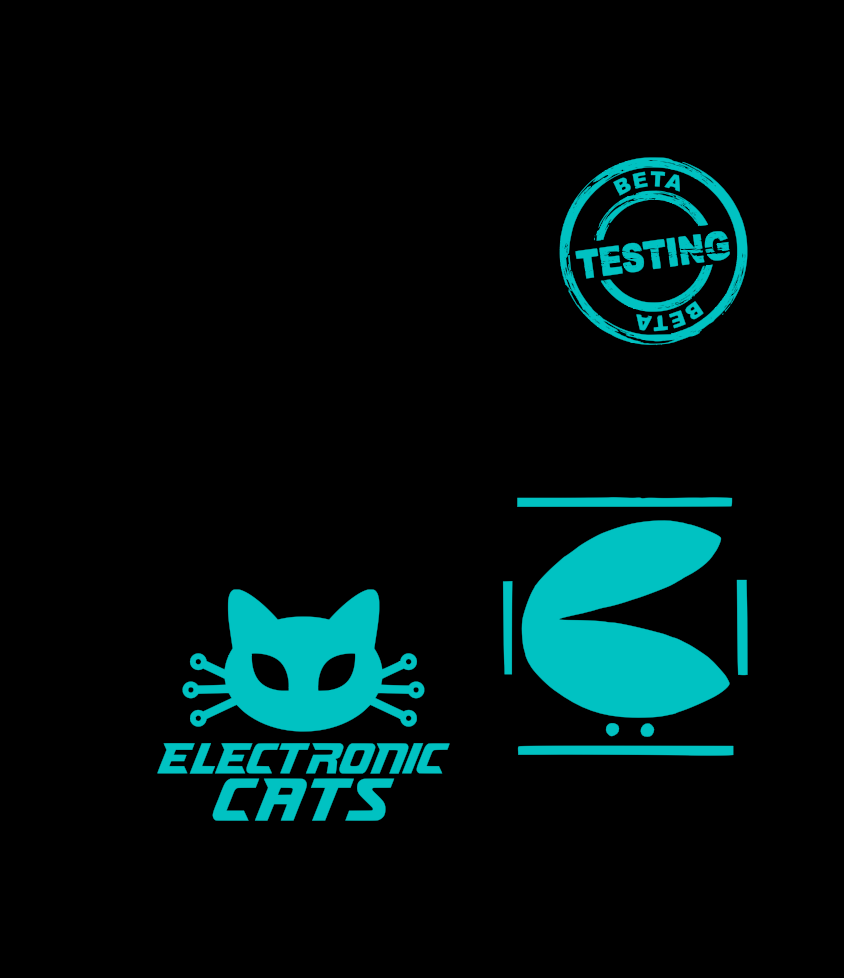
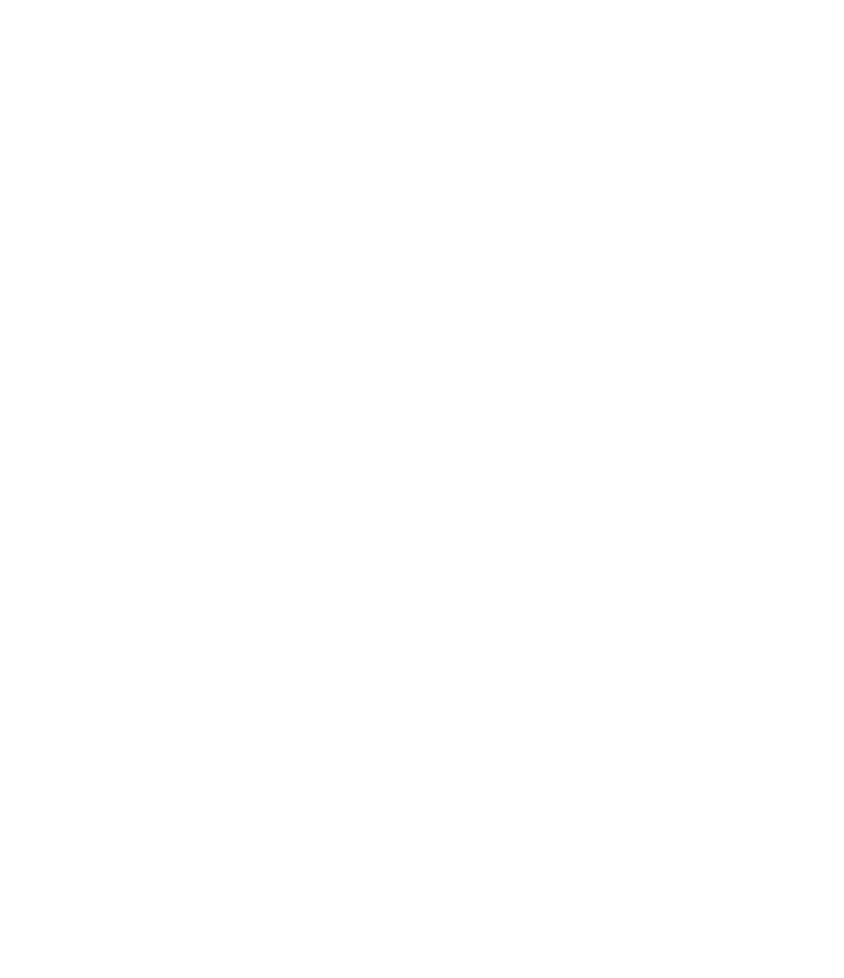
drawing: [559, 157, 748, 346] -> none
drawing: [502, 497, 748, 756] -> none
drawing: [157, 589, 450, 821] -> none

